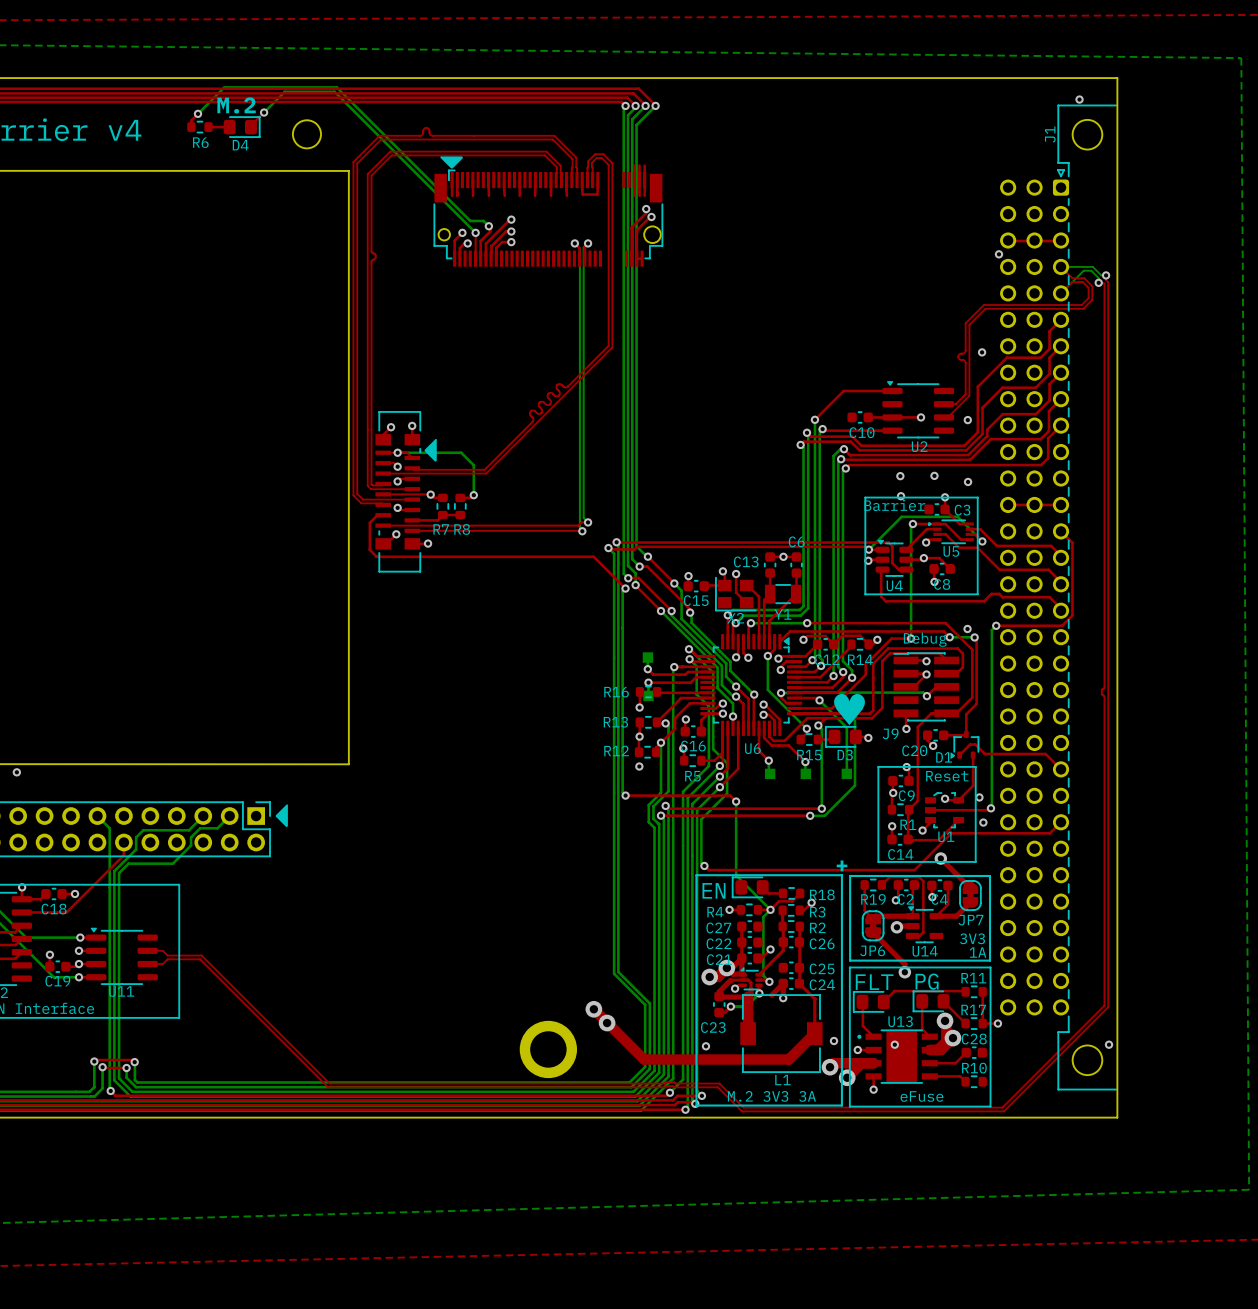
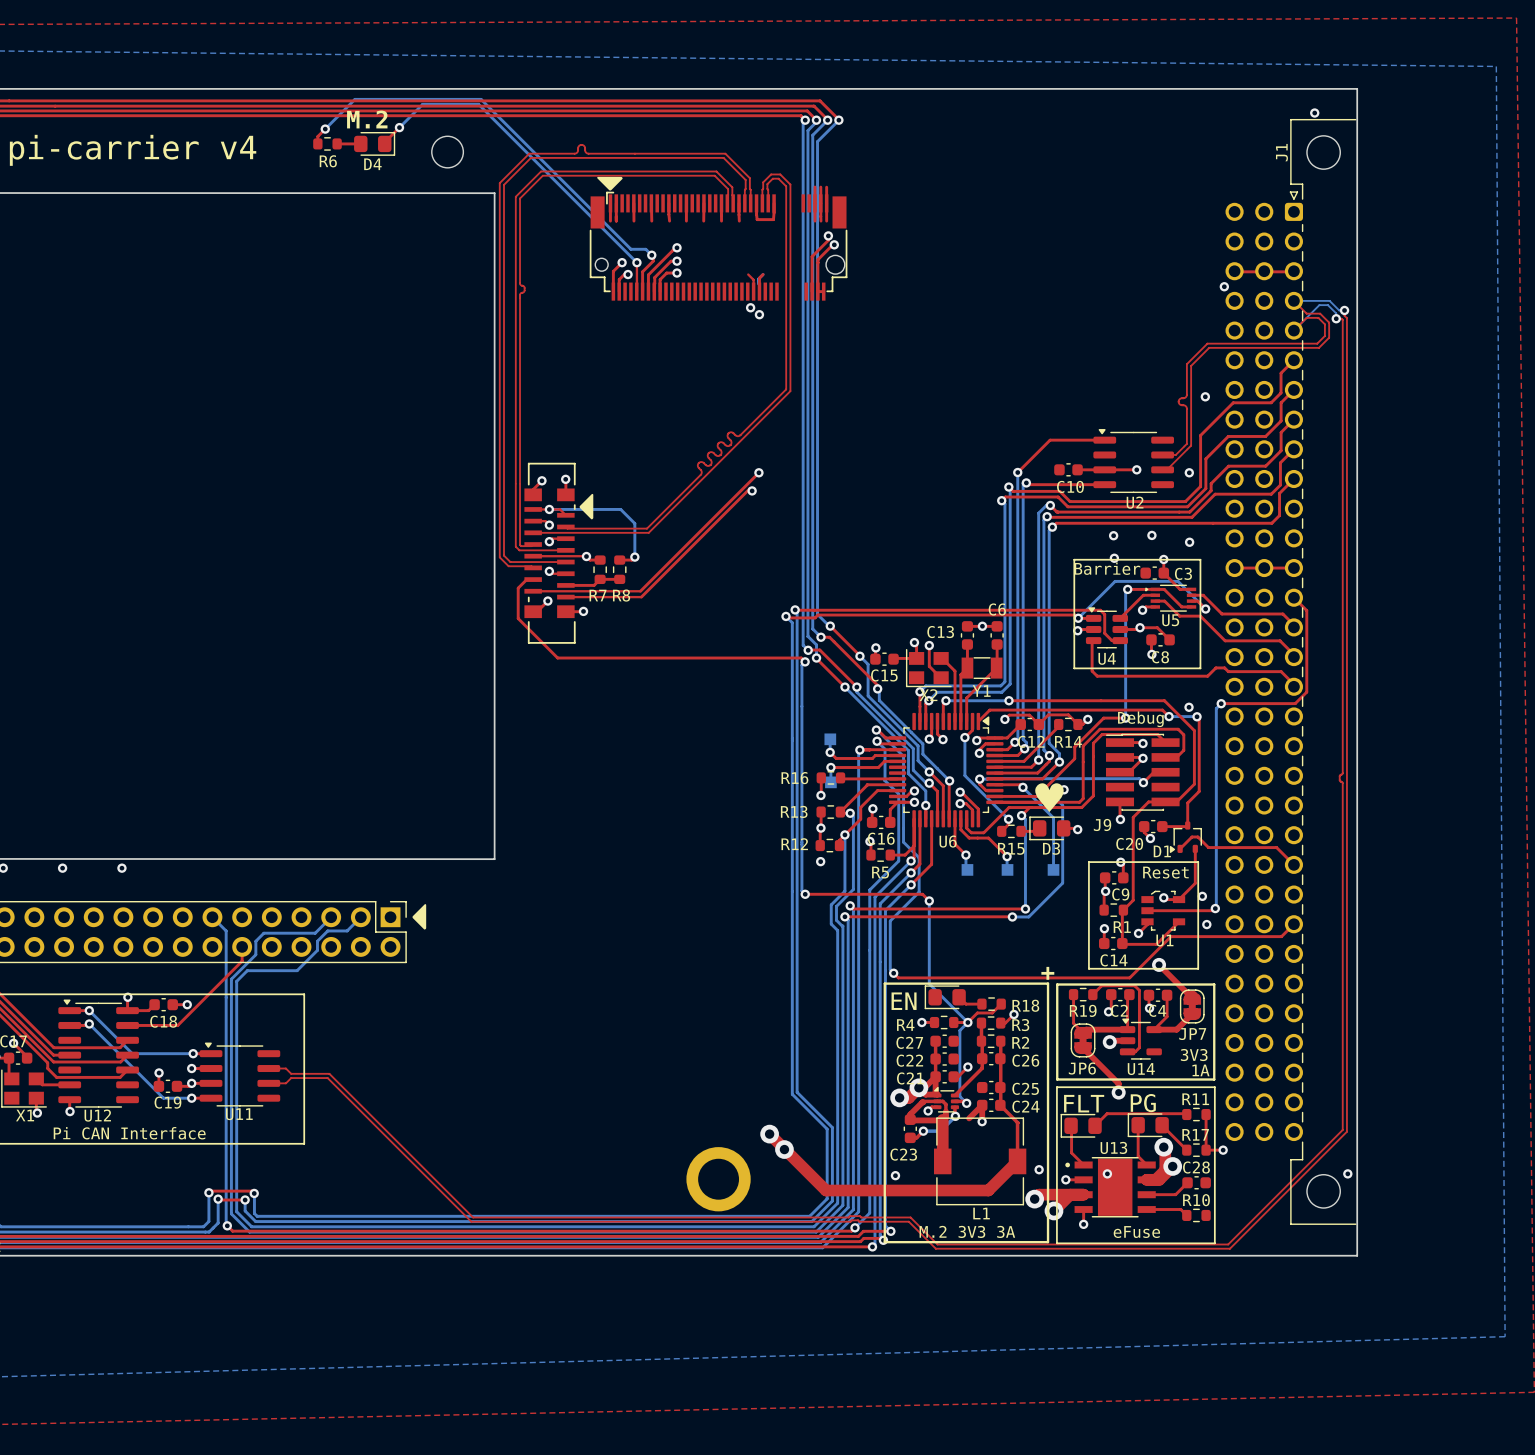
bottom track: (574, 243) (579, 248) (579, 528) (582, 531) -> none
via: (574, 243) -> none
via: (588, 243) -> none
bottom track: (583, 251) (583, 518) (588, 522) -> none
via: none -> (750, 307)
via: none -> (759, 314)
via: none -> (758, 472)
via: none -> (752, 490)
top track: (588, 522) (581, 522) (578, 525) (478, 525) -> (758, 472) (640, 591)
via: (588, 522) -> none
top track: (479, 530) (582, 531) -> (641, 597) (749, 488) (752, 490)
via: (582, 531) -> none
top track: (376, 556) (593, 556) (622, 585) -> (525, 625) (557, 658) (801, 658)

